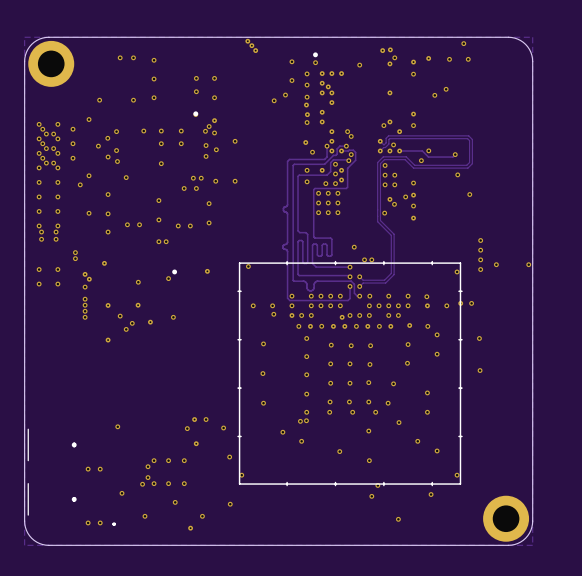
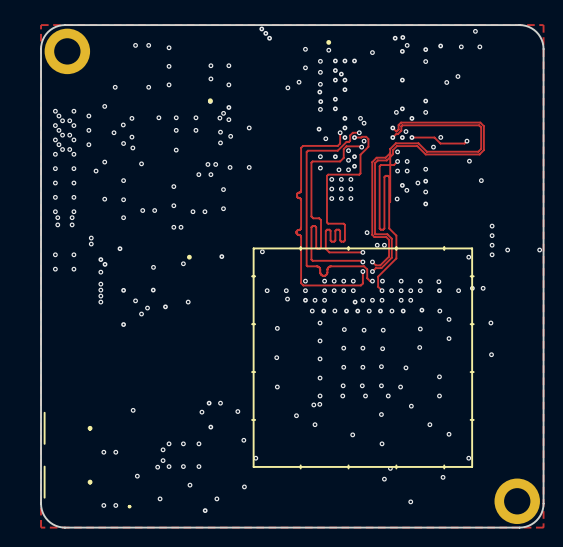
track: (380, 167) (380, 220) (394, 234) (394, 274) (385, 283) (368, 283) -> (392, 154) (386, 160) (377, 160) (375, 163) (375, 233) (387, 234) (391, 238) (391, 257) (381, 268)
track: none -> (397, 161) (393, 165) (379, 166) (379, 228) (384, 228) (384, 177) (388, 175) (389, 228) (396, 235) (396, 258) (378, 276) (378, 286) (382, 290)
track: (377, 216) (377, 221) (391, 235) (391, 273) (384, 280) (367, 280) -> (390, 153) (385, 157) (376, 157) (372, 162) (372, 234) (374, 237) (386, 237) (389, 239) (389, 256) (380, 265)

